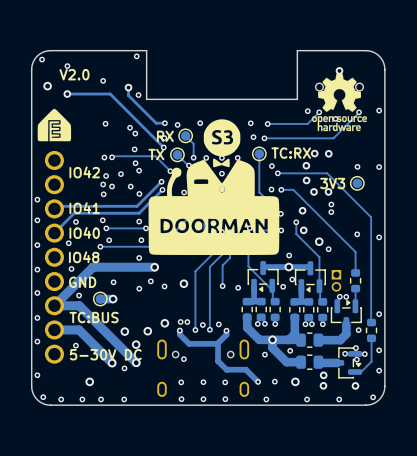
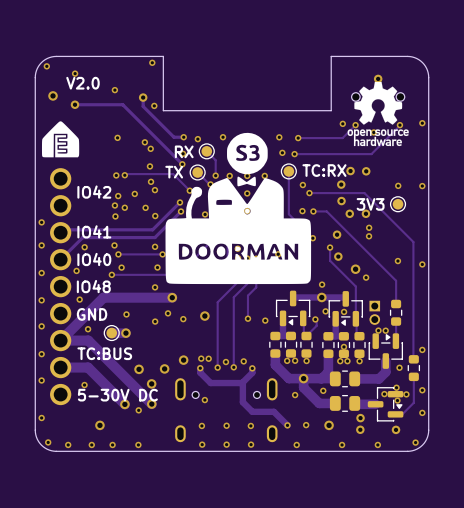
track: (281, 230) (263, 230) (248, 245) (248, 266) (272, 290) -> none
via: (281, 230) -> none
via: none -> (344, 311)
track: none -> (316, 320) (316, 325) (306, 336)
via: none -> (343, 346)

